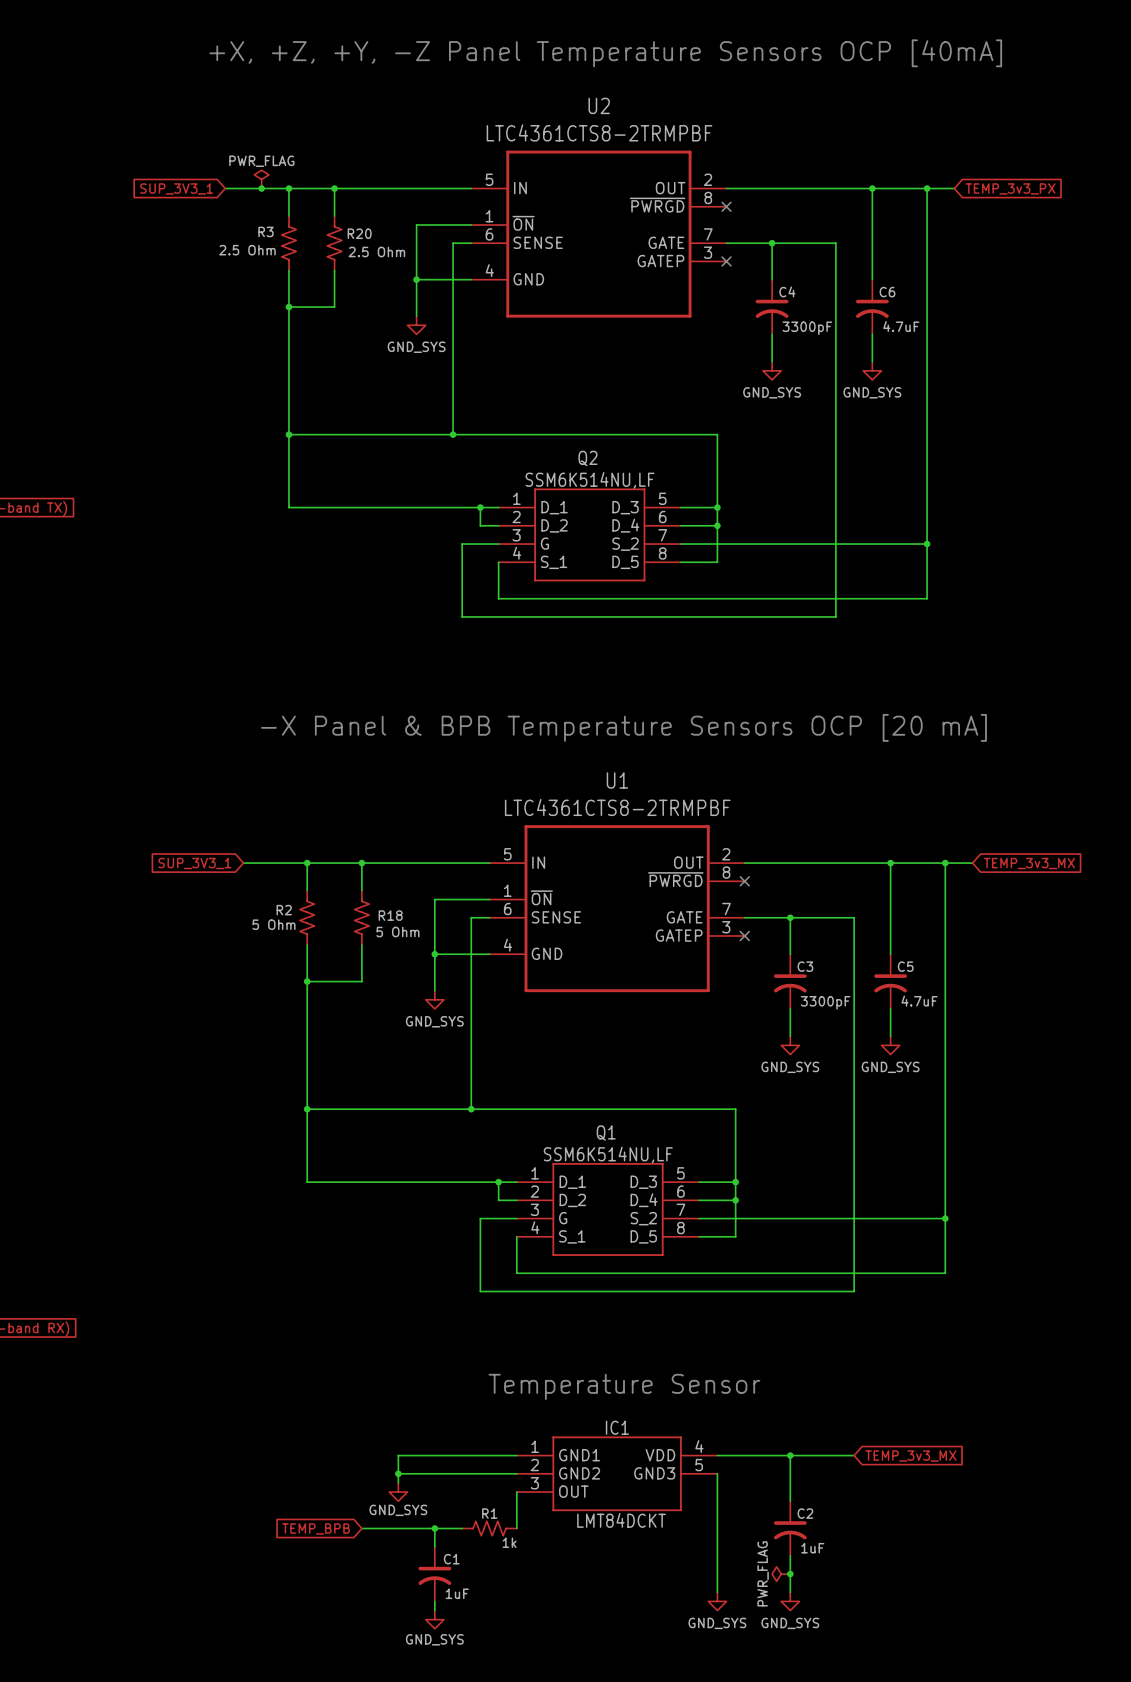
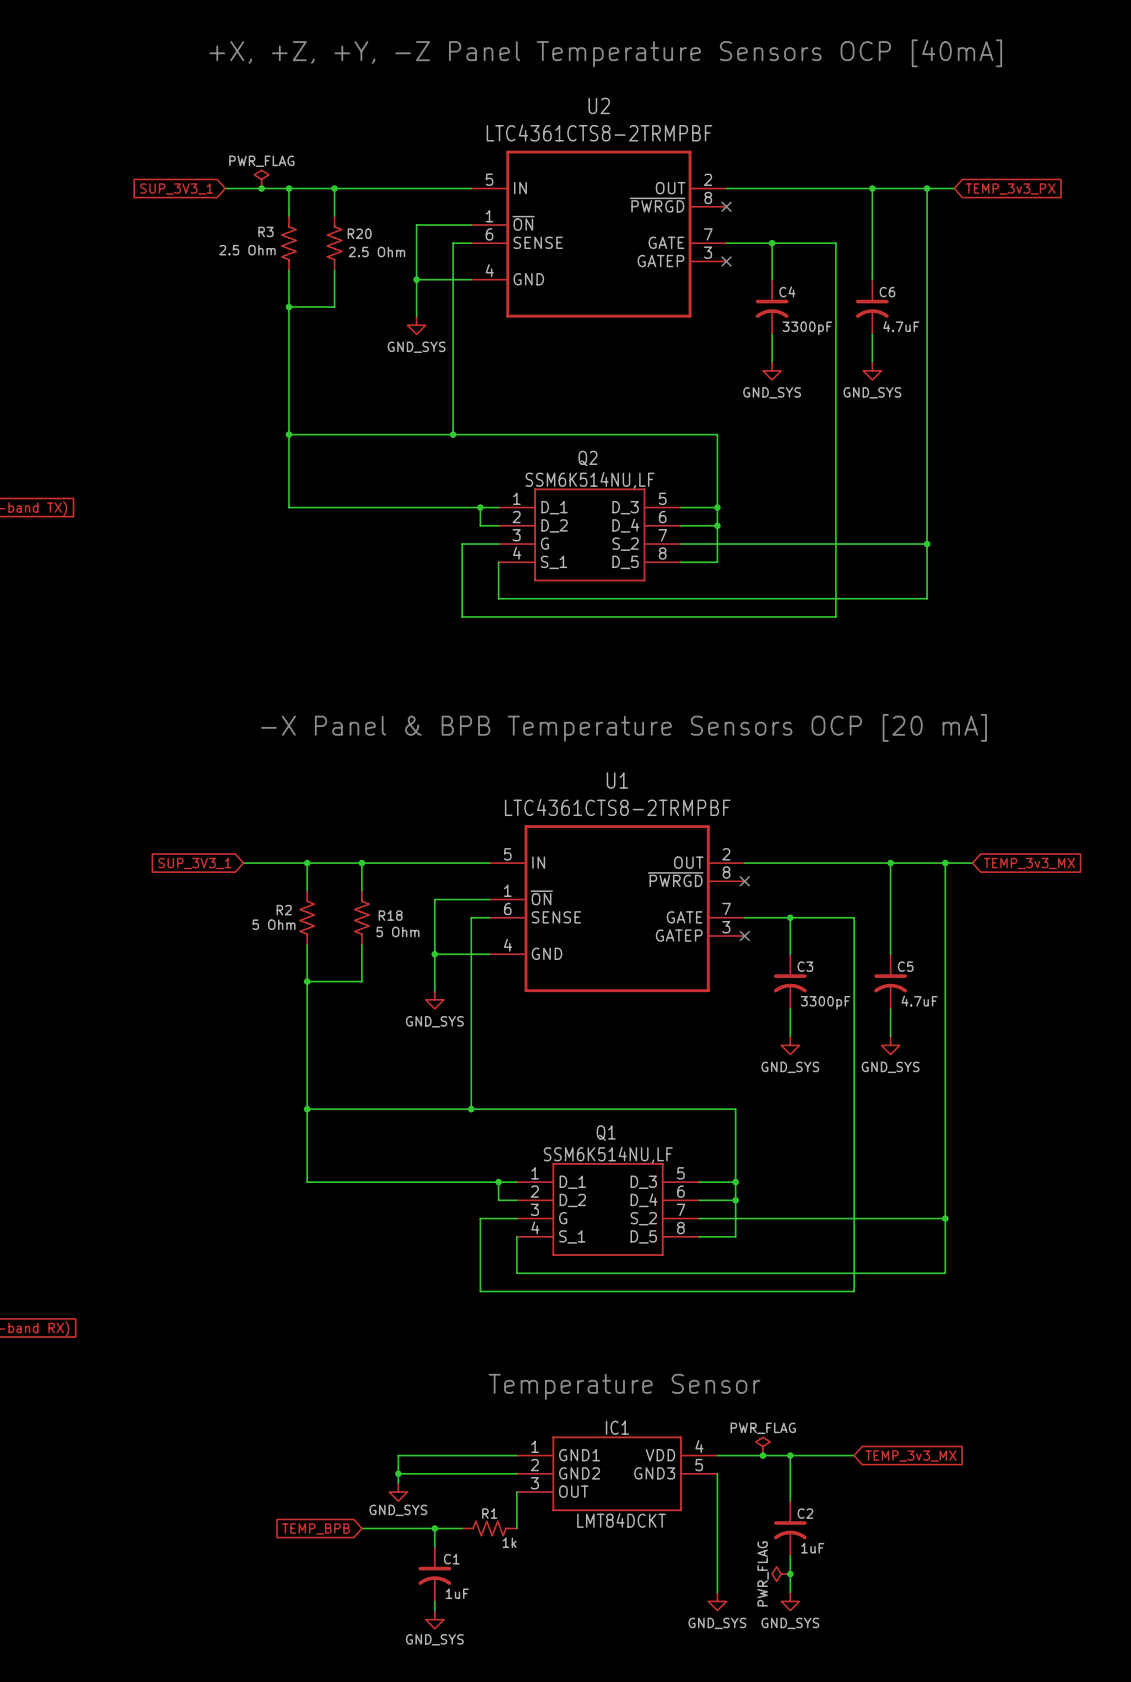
power symbol: none -> PWR_FLAG (762, 1446)
junction: none -> (762, 1455)

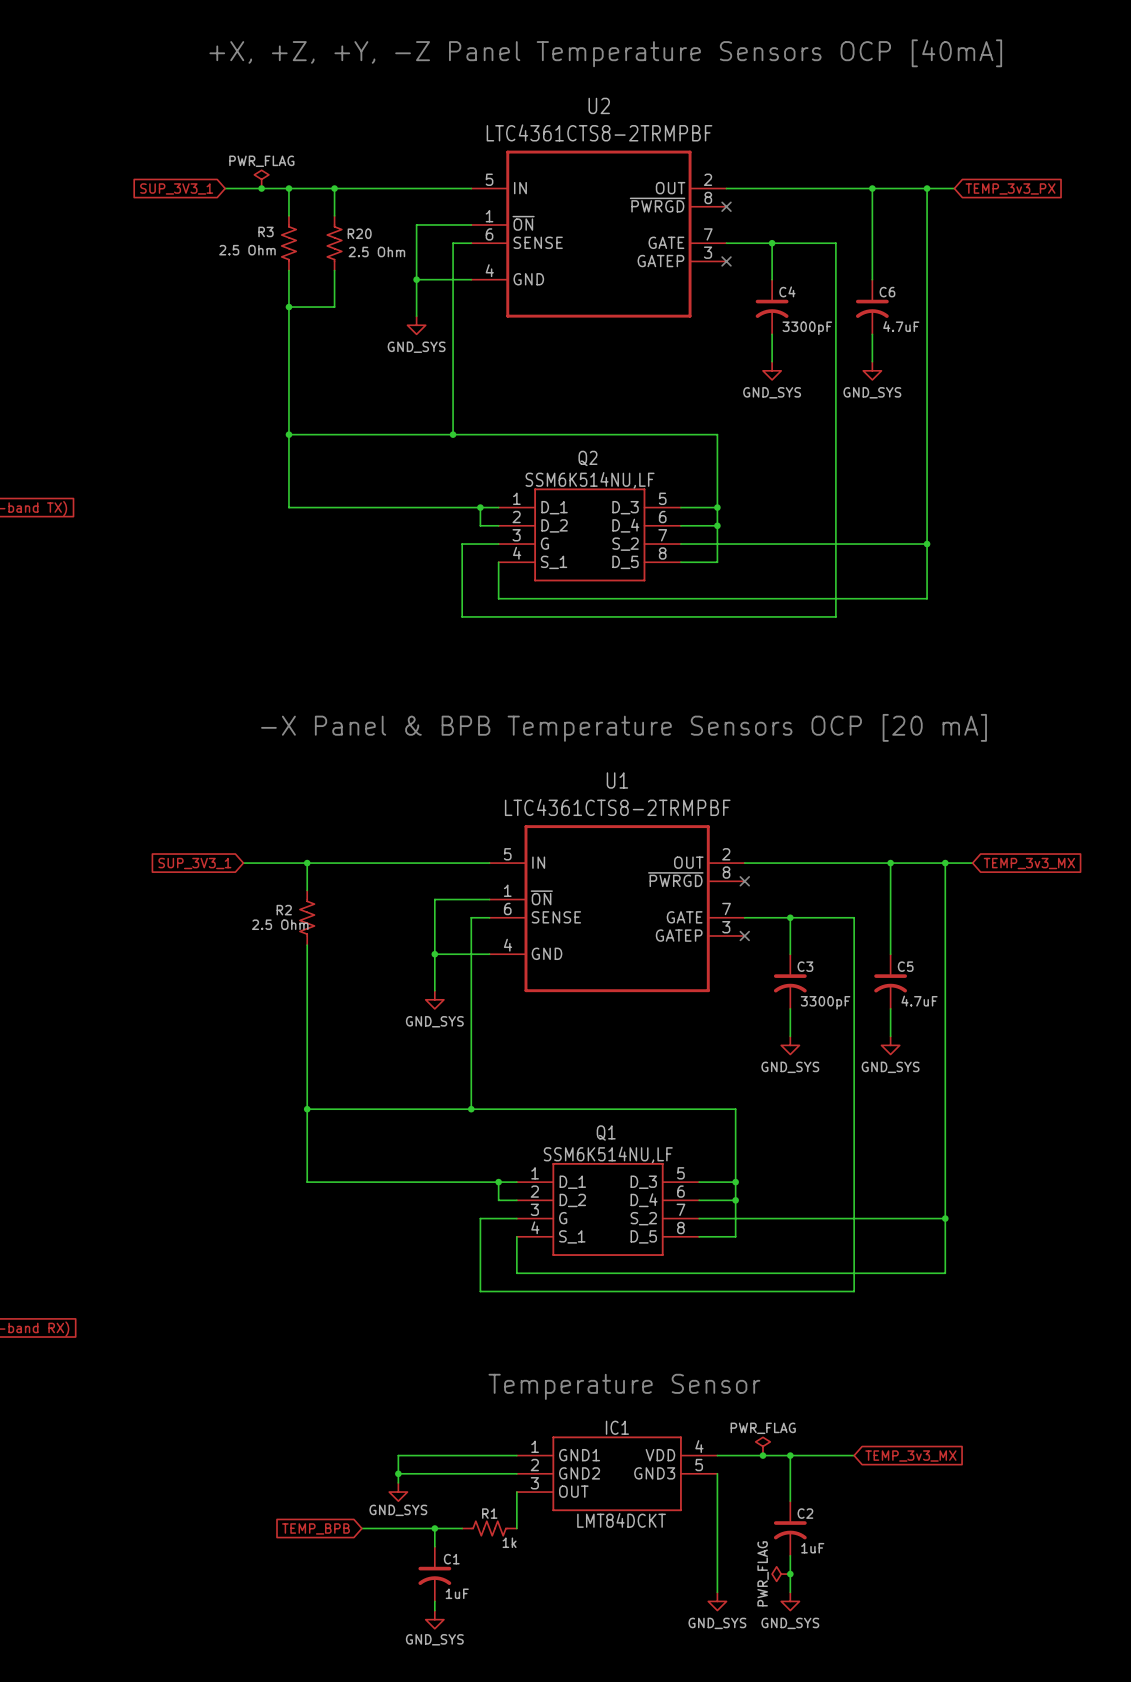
wire: (361, 863) (361, 890) -> none
junction: (361, 863) -> none
R18: 5 Ohm (361, 917) -> none
R2 value: 5 Ohm (273, 924) -> 2.5 Ohm (280, 924)
wire: (361, 945) (361, 981) (307, 981) -> none
junction: (307, 981) -> none

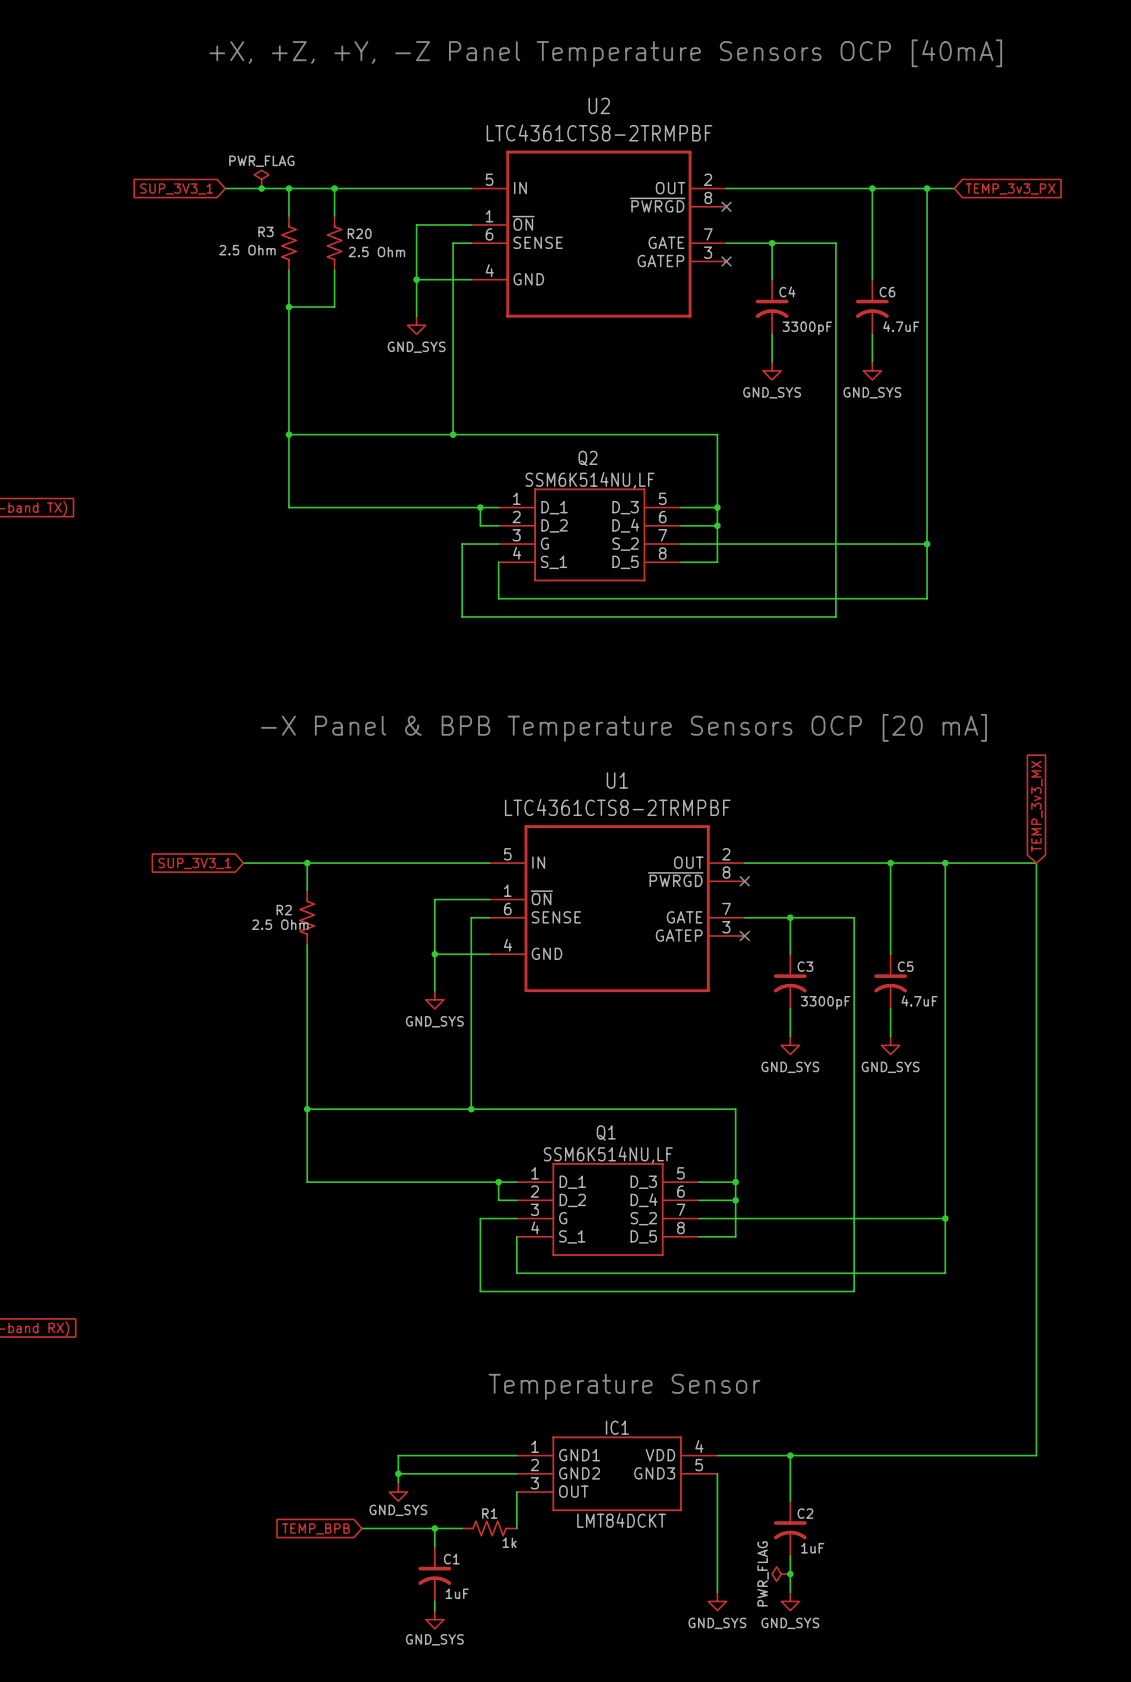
wire: none -> (972, 863) (1036, 863) (1036, 1455) (854, 1455)
global label rotation: 0° (1029, 863) -> 90° counterclockwise (1036, 806)
power symbol: PWR_FLAG (762, 1446) -> none
junction: (762, 1455) -> none
global label: TEMP_3v3_MX (910, 1456) -> none

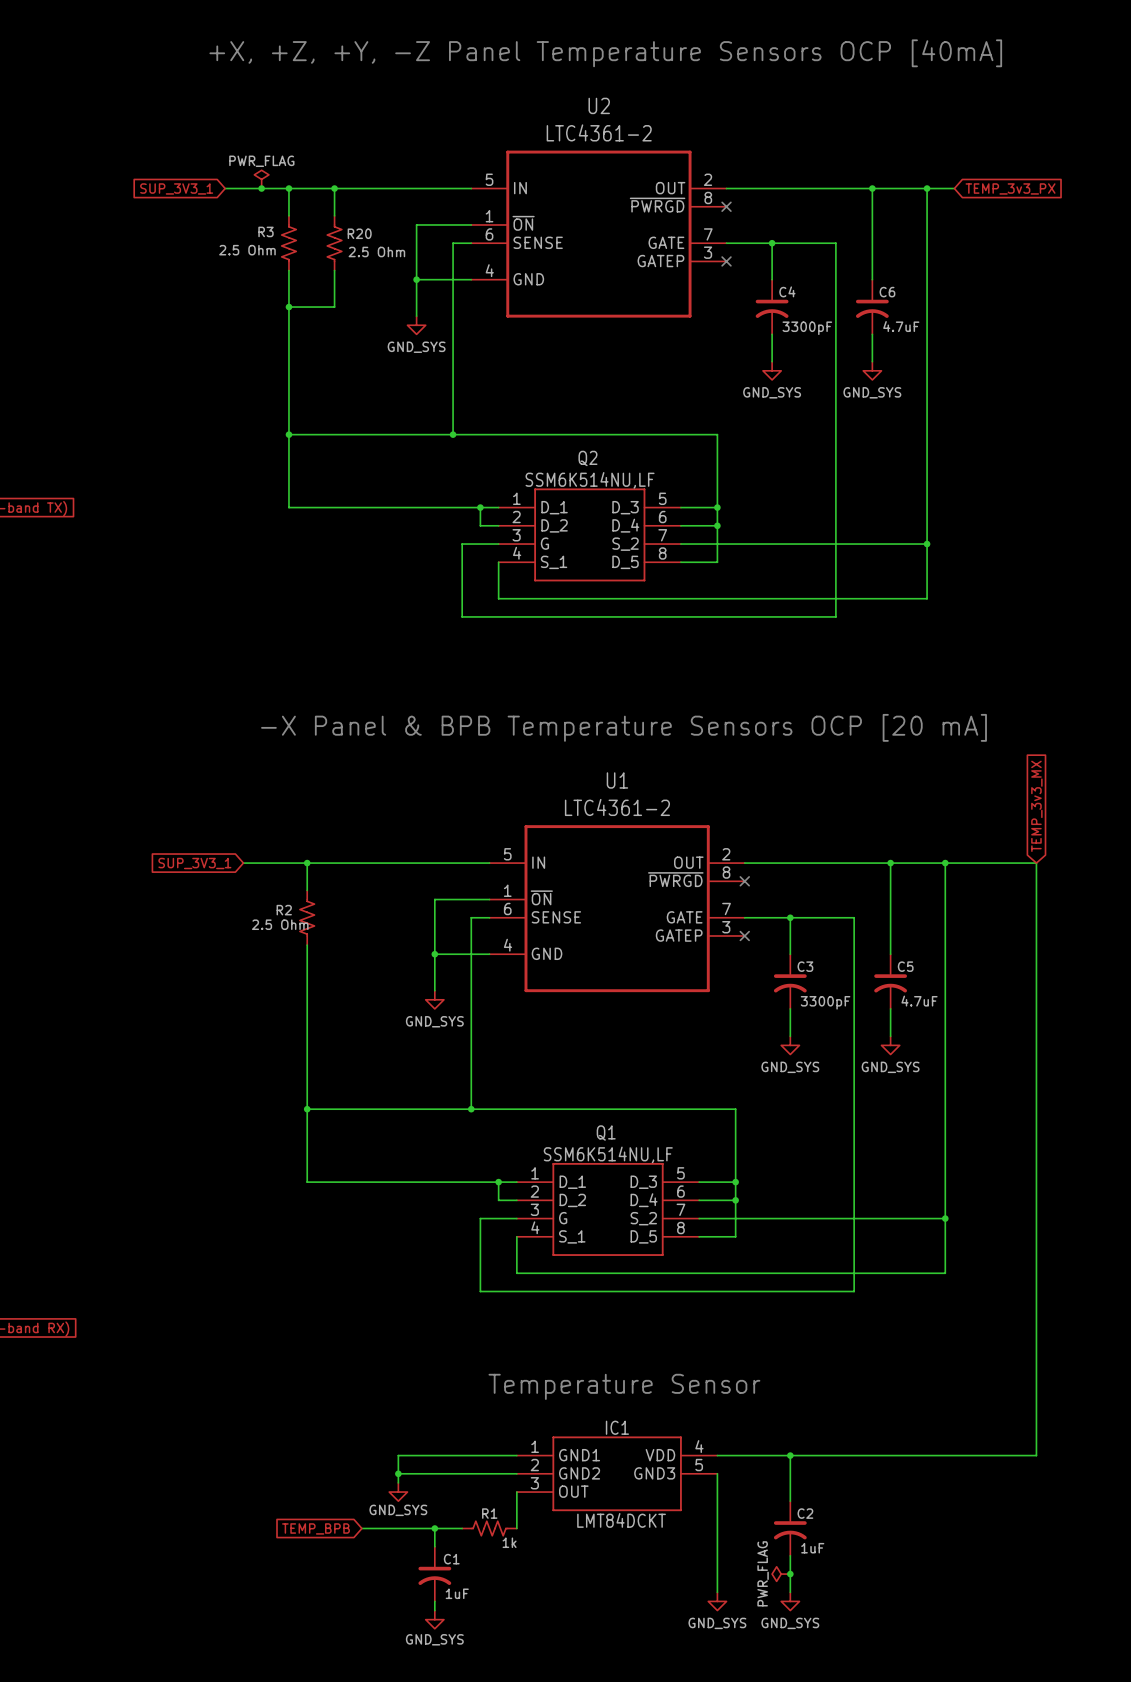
U2 value: LTC4361CTS8-2TRMPBF (599, 132) -> LTC4361-2 (599, 132)
U1 value: LTC4361CTS8-2TRMPBF (617, 807) -> LTC4361-2 (617, 807)

